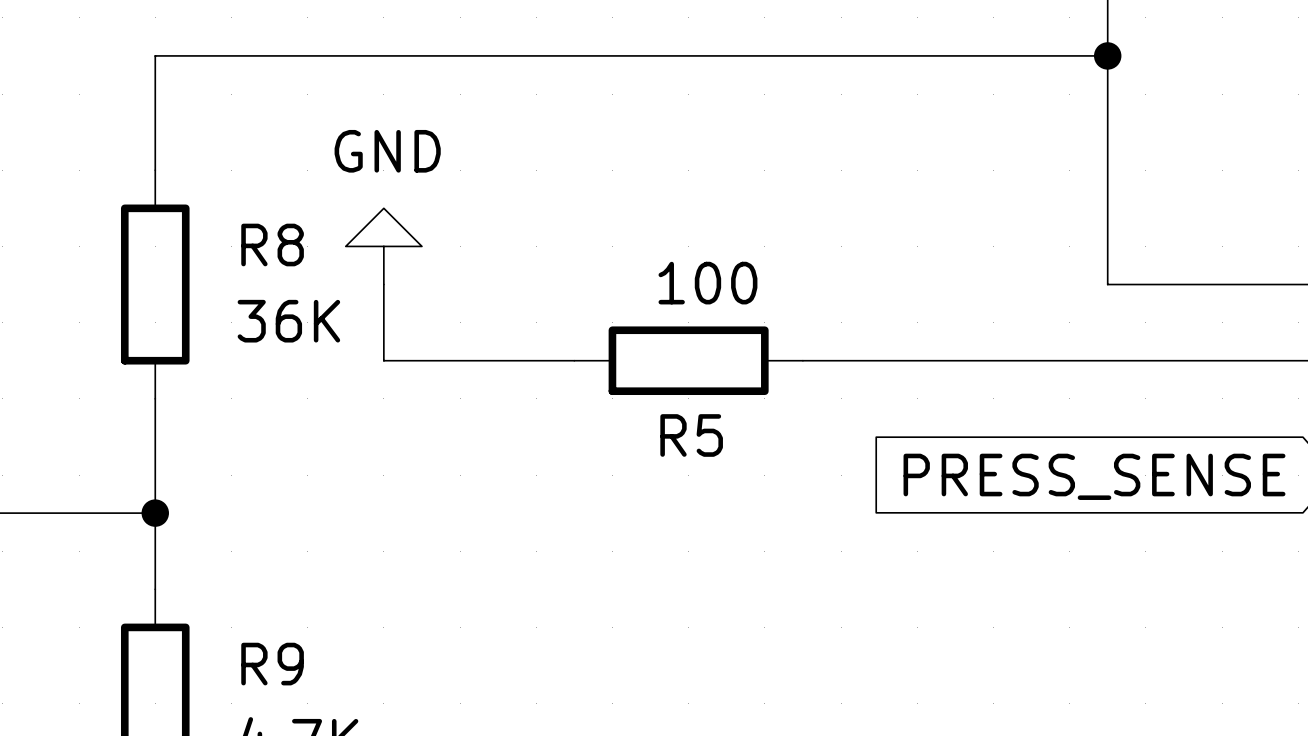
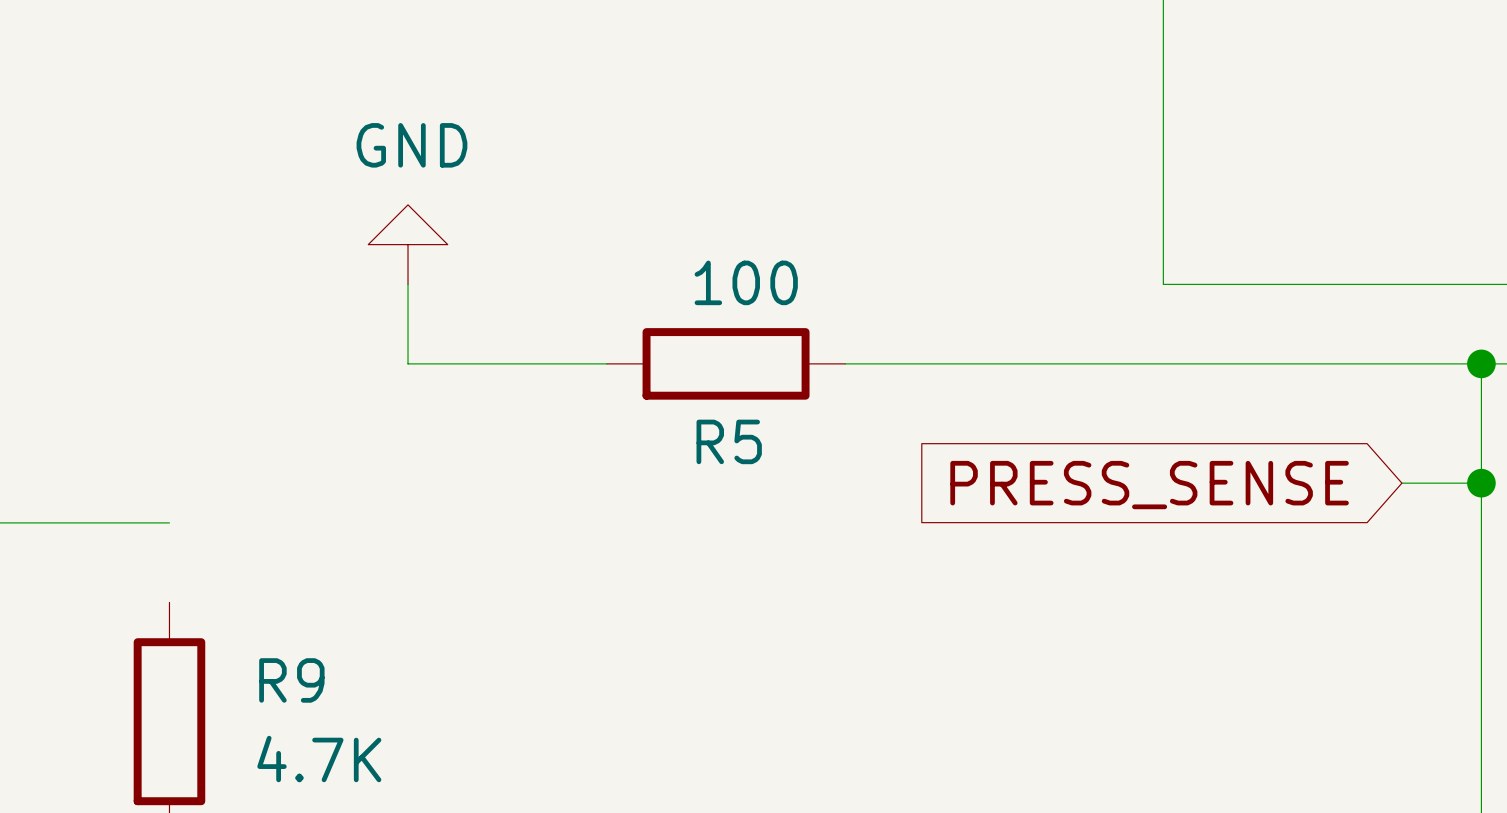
wire: (1107, 55) (155, 55) (155, 170) -> none
junction: (1107, 55) -> none
R8: 36K (155, 284) -> none
wire: (155, 398) (155, 589) -> none
junction: (155, 513) -> none

